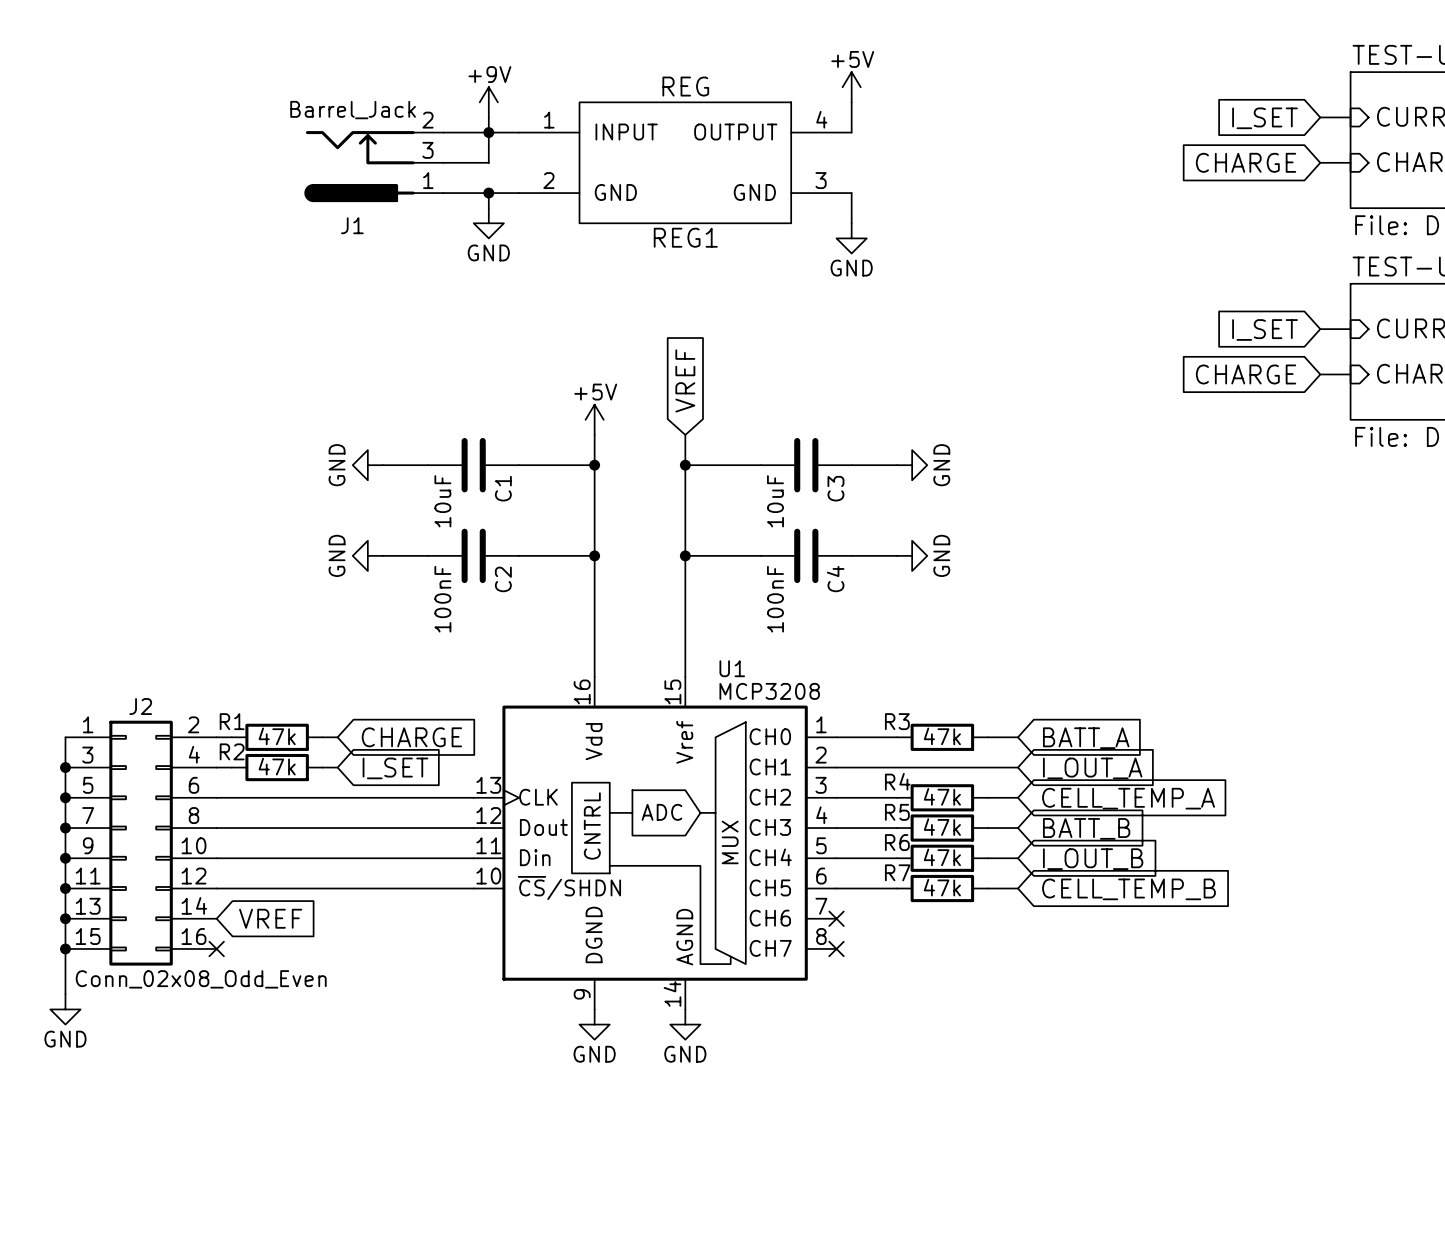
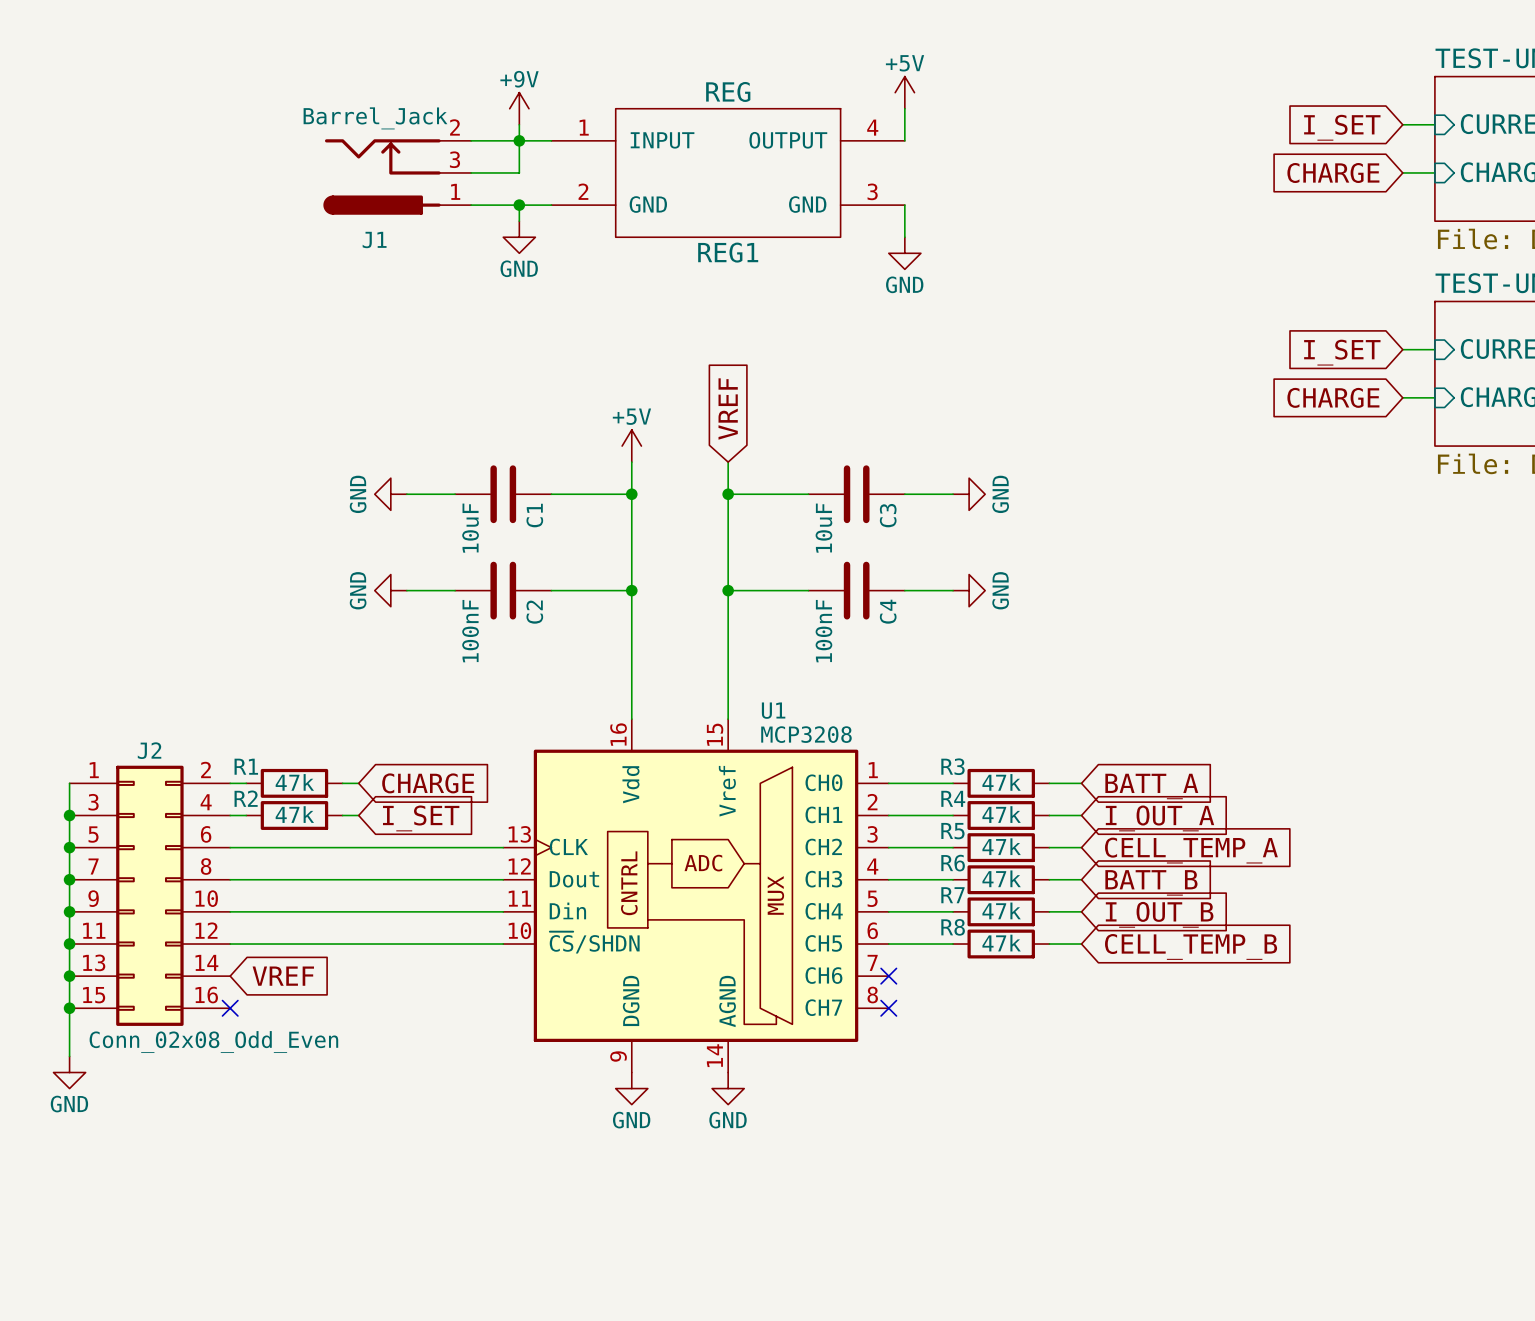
wire: (897, 767) (987, 767) -> none
R4: none -> 47k (1001, 815)
R4 name: R4 (897, 781) -> R5 (952, 831)
R5 name: R5 (897, 812) -> R6 (953, 863)
R6 name: R6 (897, 842) -> R7 (952, 895)
R7 name: R7 (897, 872) -> R8 (953, 927)

